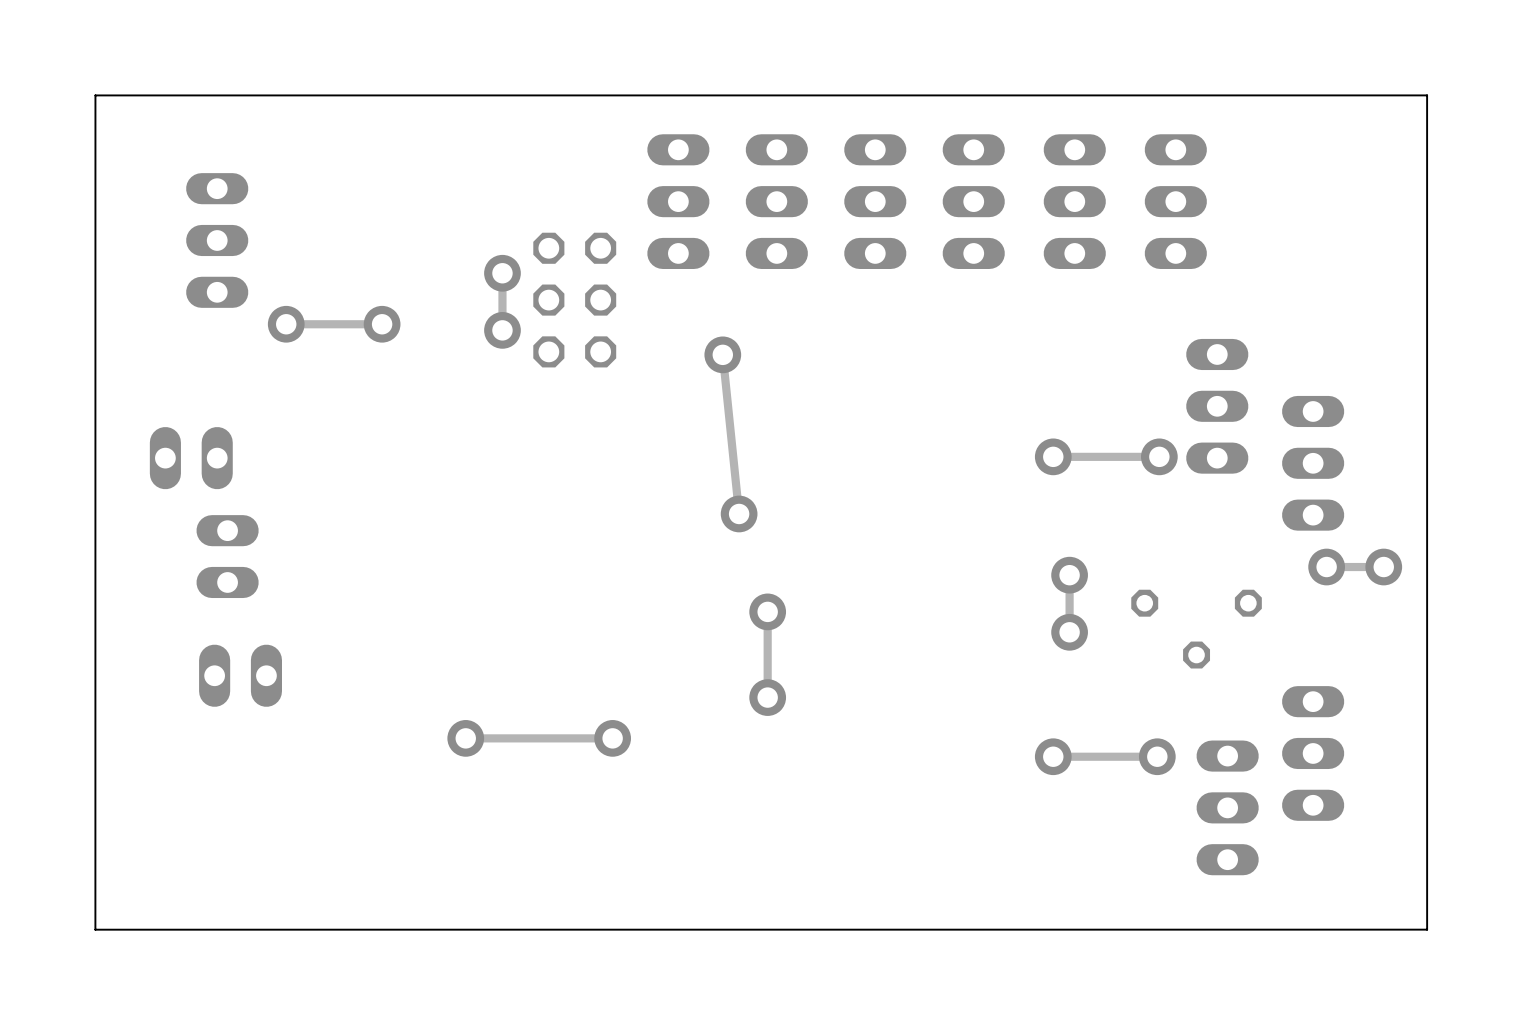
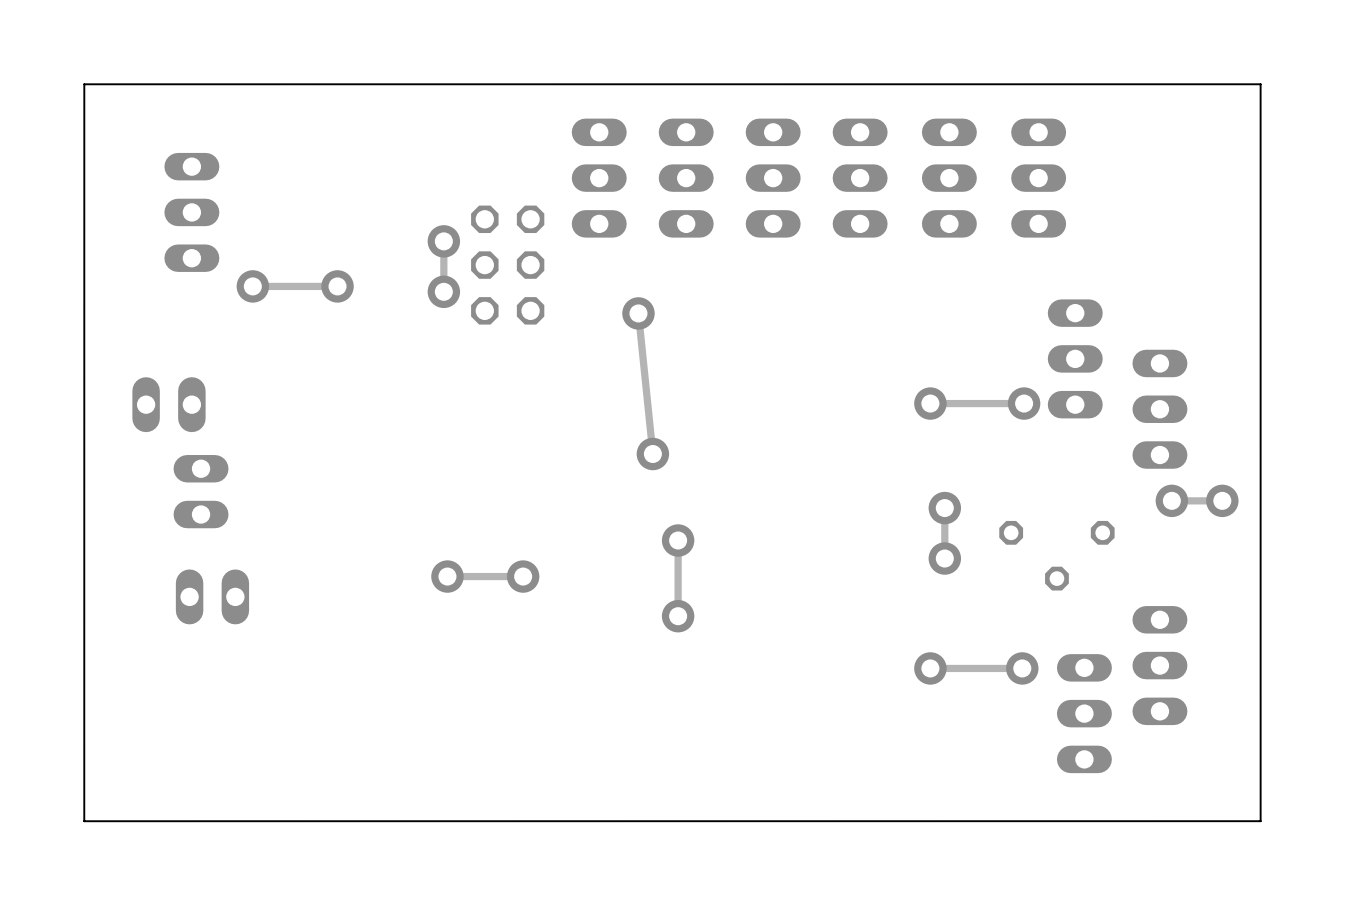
via: none -> (447, 576)
track: none -> (523, 576) (447, 576)
via: none -> (523, 576)
via: (465, 738) -> none
track: (612, 738) (465, 738) -> none
via: (612, 738) -> none

